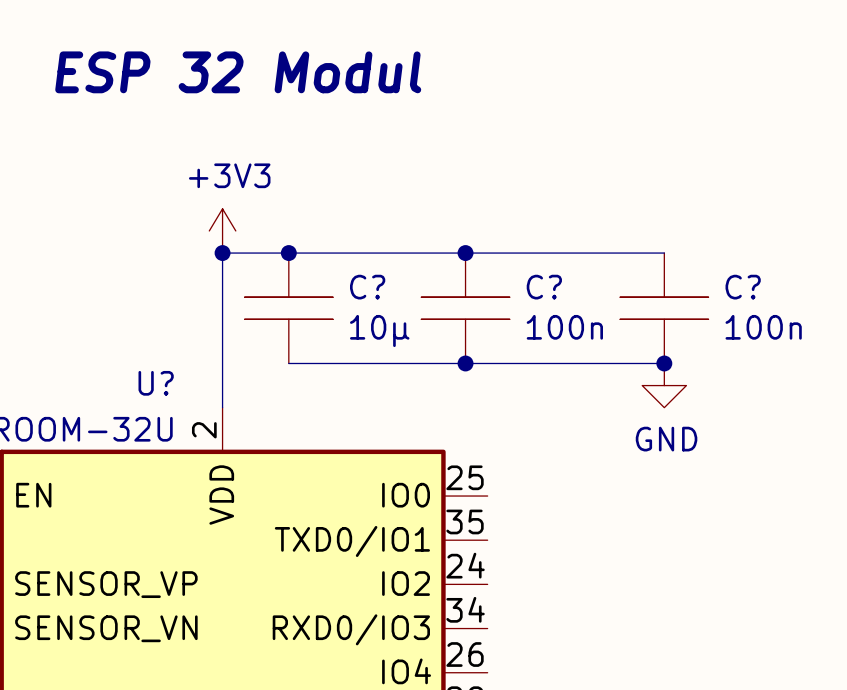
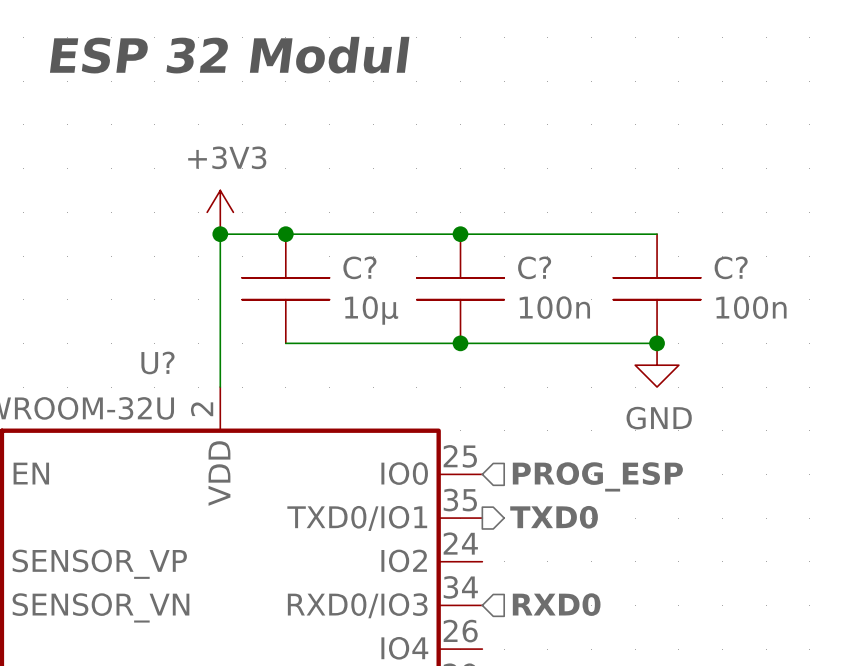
hierarchical label: none -> PROG_ESP (597, 476)
hierarchical label: none -> TXD0 (554, 517)
hierarchical label: none -> RXD0 (556, 604)

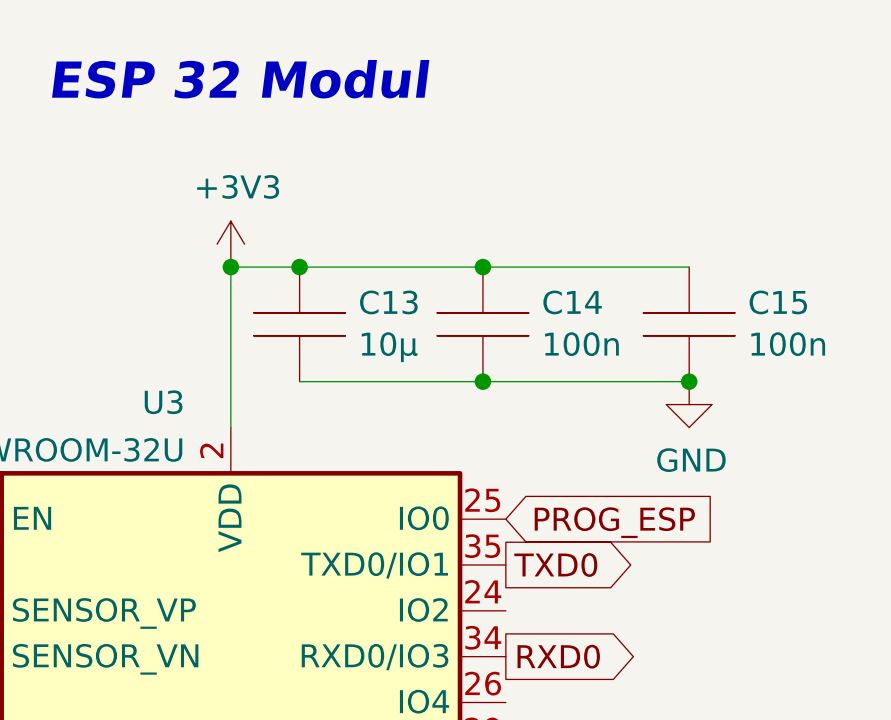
C? name: C? (359, 267) -> C13 (388, 302)
C? name: C? (534, 267) -> C14 (572, 302)
C? name: C? (731, 267) -> C15 (778, 302)
U? name: U? (157, 362) -> U3 (163, 402)
hierarchical label: PROG_ESP (597, 476) -> none
global label: none -> PROG_ESP (614, 522)
hierarchical label: TXD0 (554, 517) -> none
global label: none -> TXD0 (555, 565)
hierarchical label: RXD0 (556, 604) -> none
global label: none -> RXD0 (558, 656)

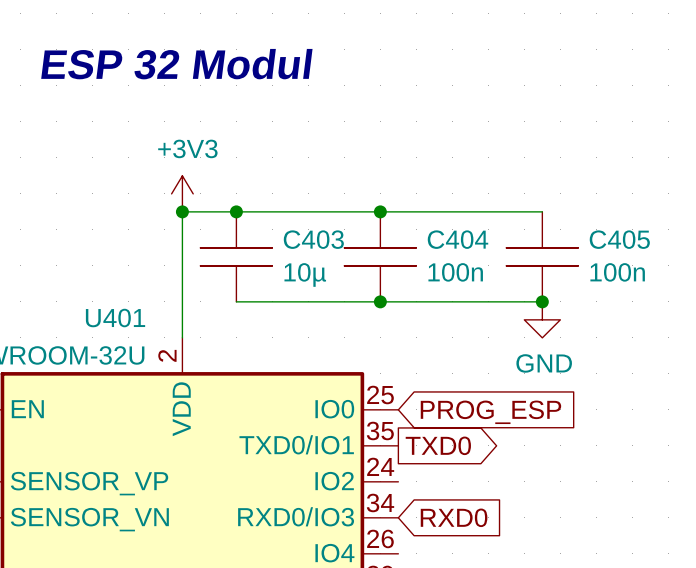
C13 name: C13 (388, 302) -> C403 (313, 239)
C14 name: C14 (572, 302) -> C404 (458, 239)
C15 name: C15 (778, 302) -> C405 (619, 239)
U3 name: U3 (163, 402) -> U401 (115, 318)
global label shape: output (558, 656) -> input (454, 517)

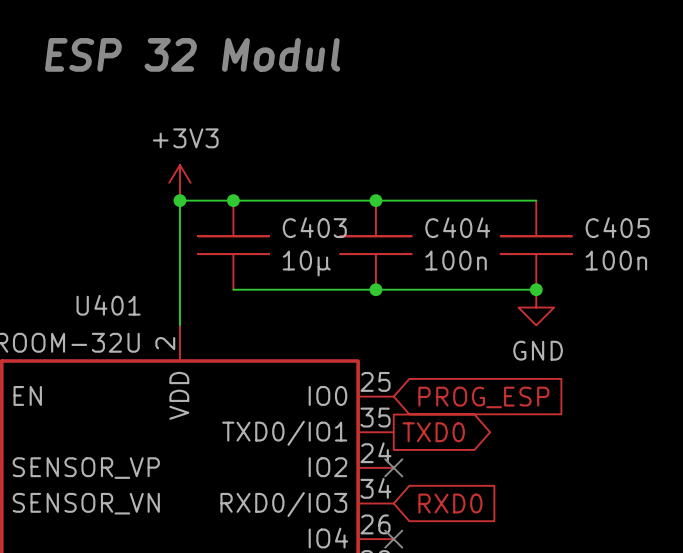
no-connect mark: none -> (393, 467)
no-connect mark: none -> (393, 539)

